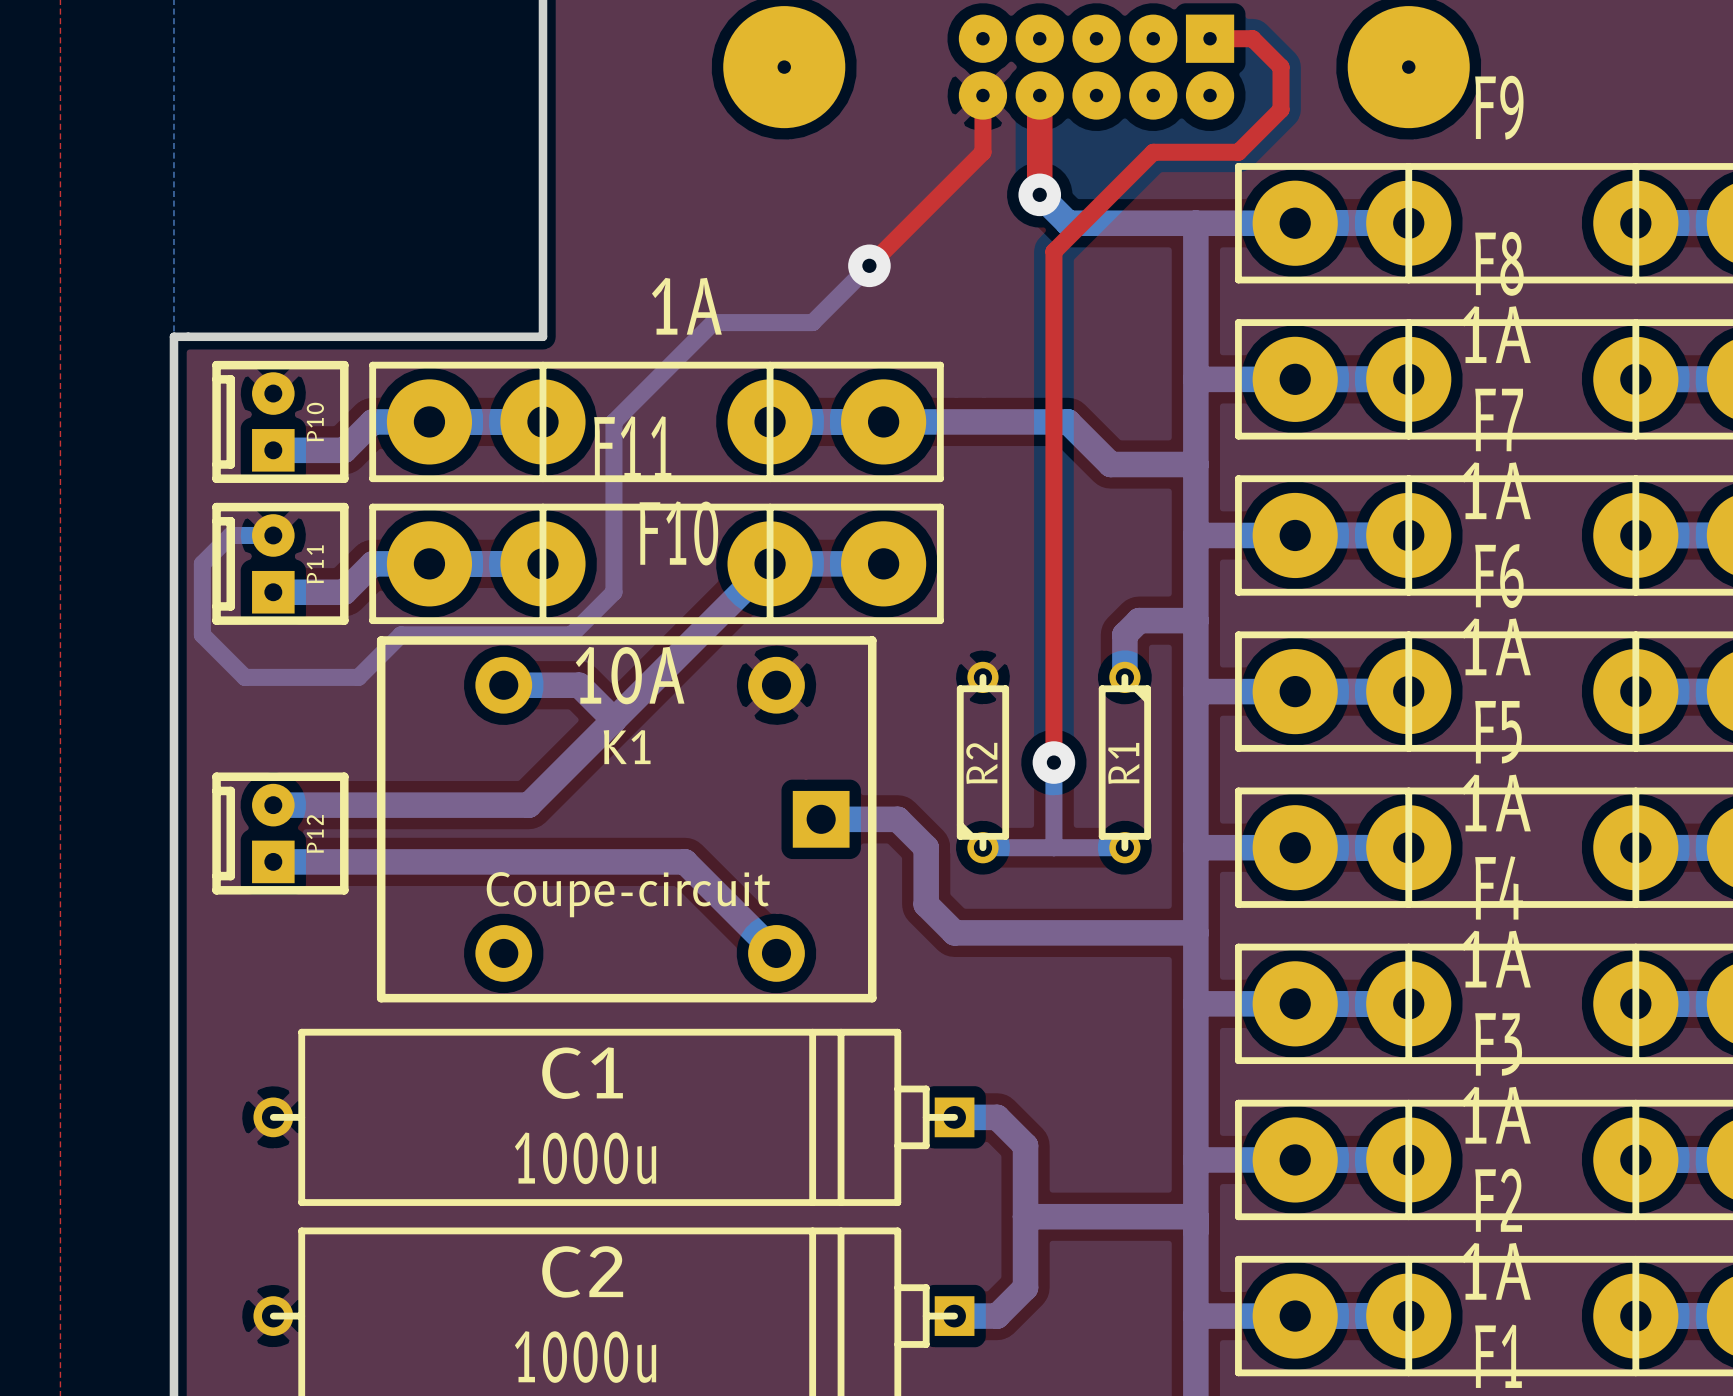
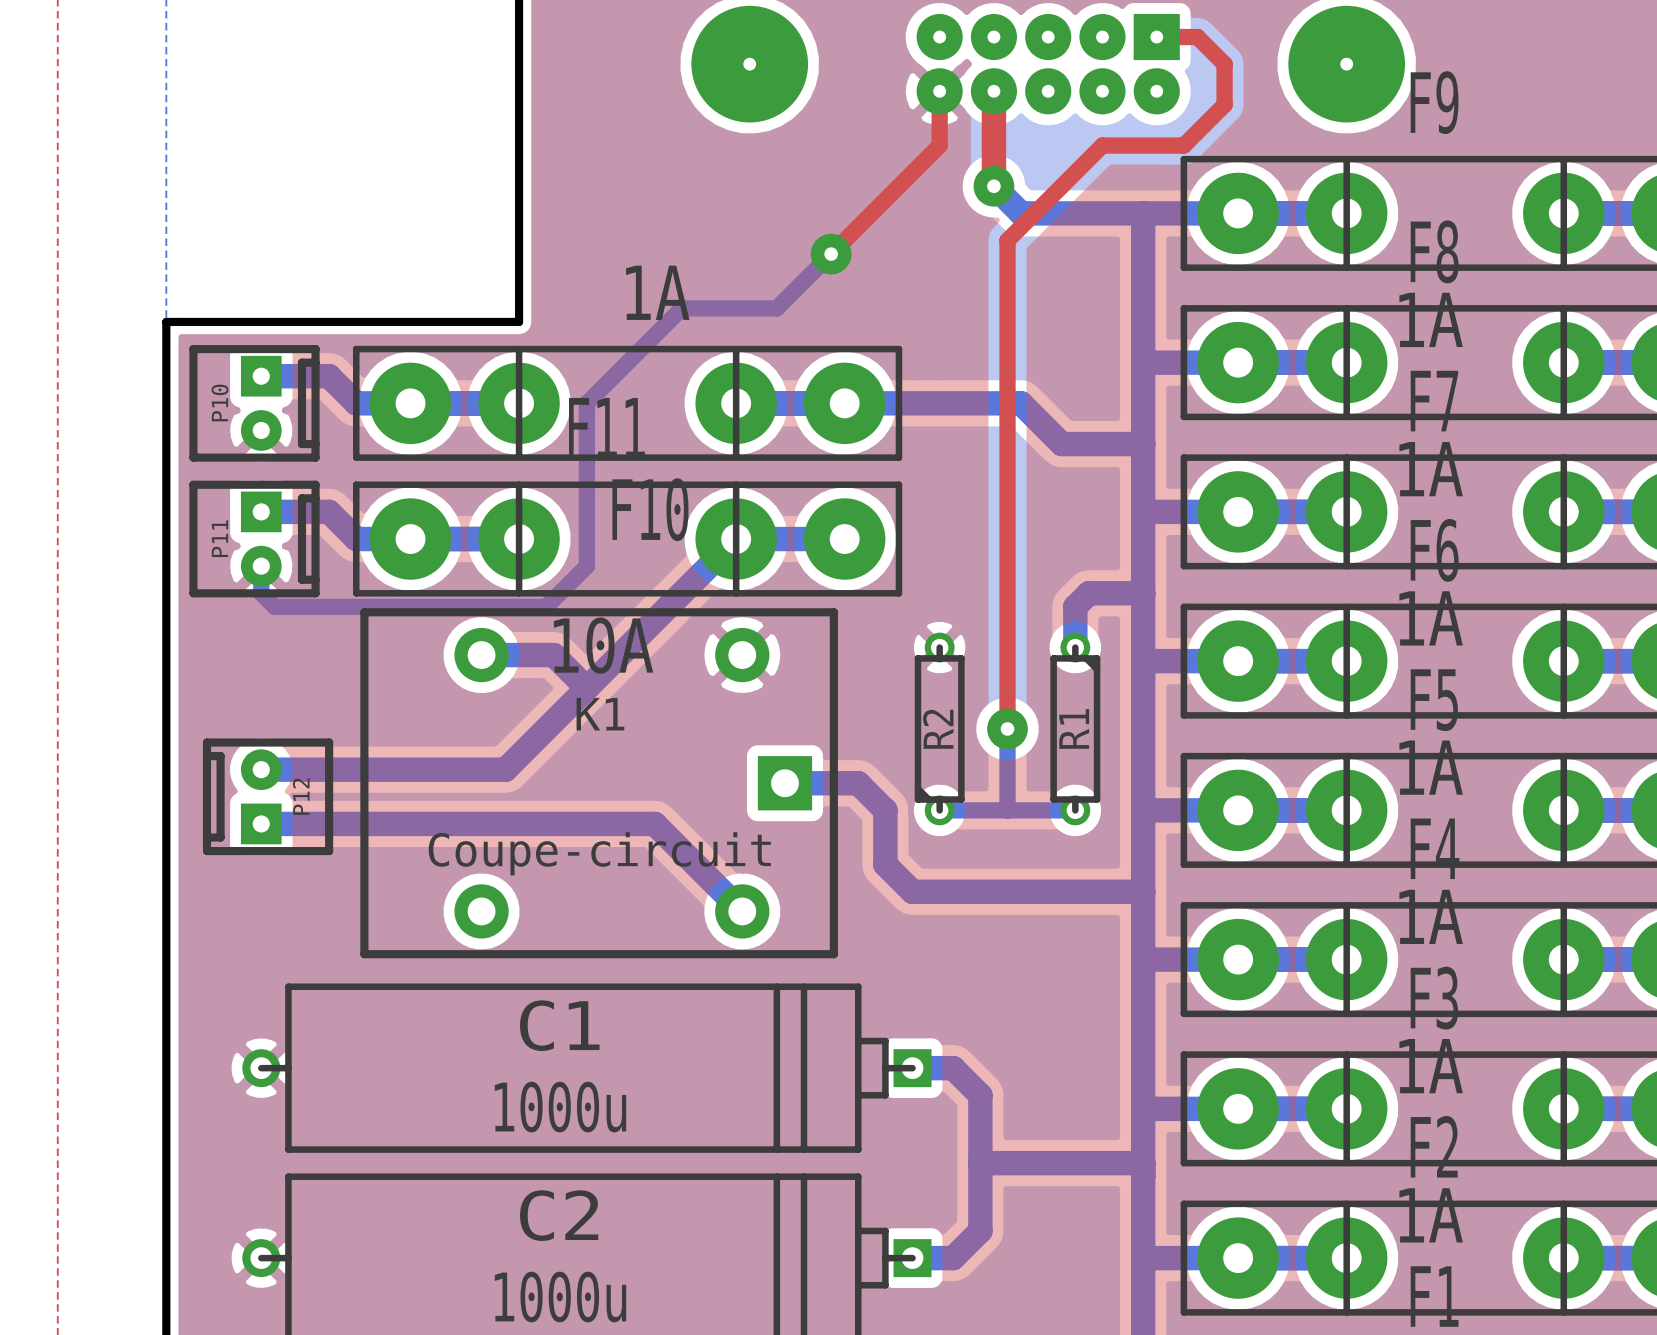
P10 rotation: 0° (280, 421) -> 180° (254, 403)
bottom track: (372, 421) (344, 450) (273, 450) -> (356, 403) (329, 376) (261, 376)
bottom track: (273, 535) (230, 535) (202, 563) (202, 634) (244, 677) (358, 677) (401, 634) -> (261, 566) (261, 593) (274, 606) (383, 606)
P11 rotation: 0° (280, 563) -> 180° (254, 539)
bottom track: (372, 563) (344, 592) (273, 592) -> (356, 539) (329, 511) (261, 511)

